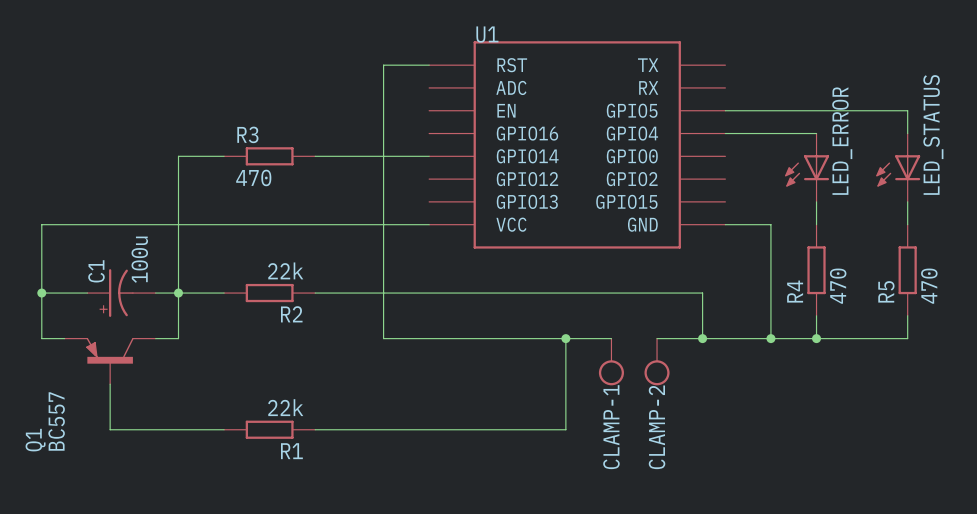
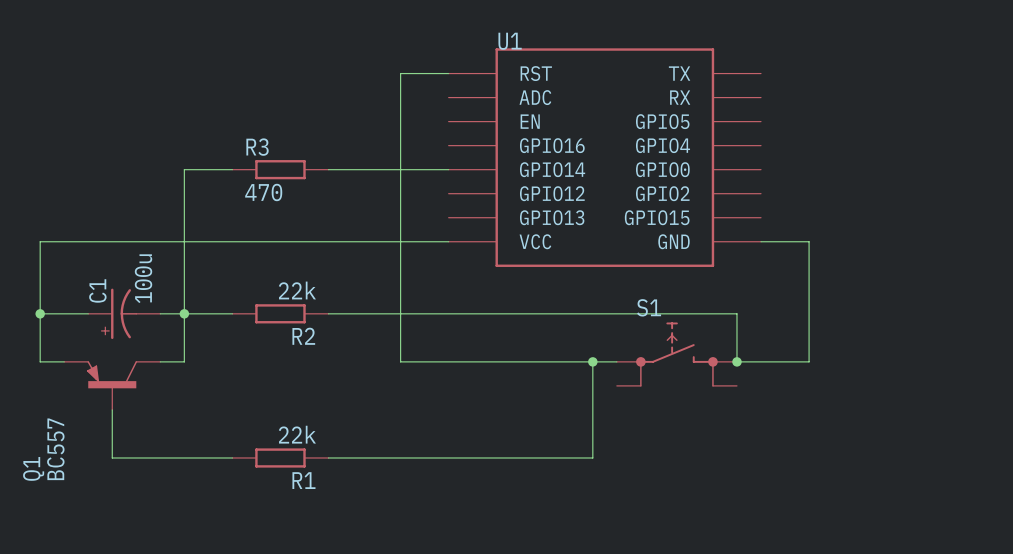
wire: (725, 110) (907, 110) (907, 133) -> none
wire: (725, 133) (816, 133) -> none
LED_ERROR: (807, 167) -> none
LED_STATUS: (898, 167) -> none
wire: (816, 201) (816, 224) -> none
wire: (907, 201) (907, 224) -> none
R4: 470 (816, 270) -> none
R5: 470 (907, 270) -> none
wire: (816, 315) (816, 338) -> none
wire: (907, 315) (907, 338) (770, 338) -> none
S1: none -> (676, 354)
junction: (770, 338) -> none
junction: (816, 338) -> none
CLAMP-1: (611, 361) -> none
CLAMP-2: (657, 361) -> none

